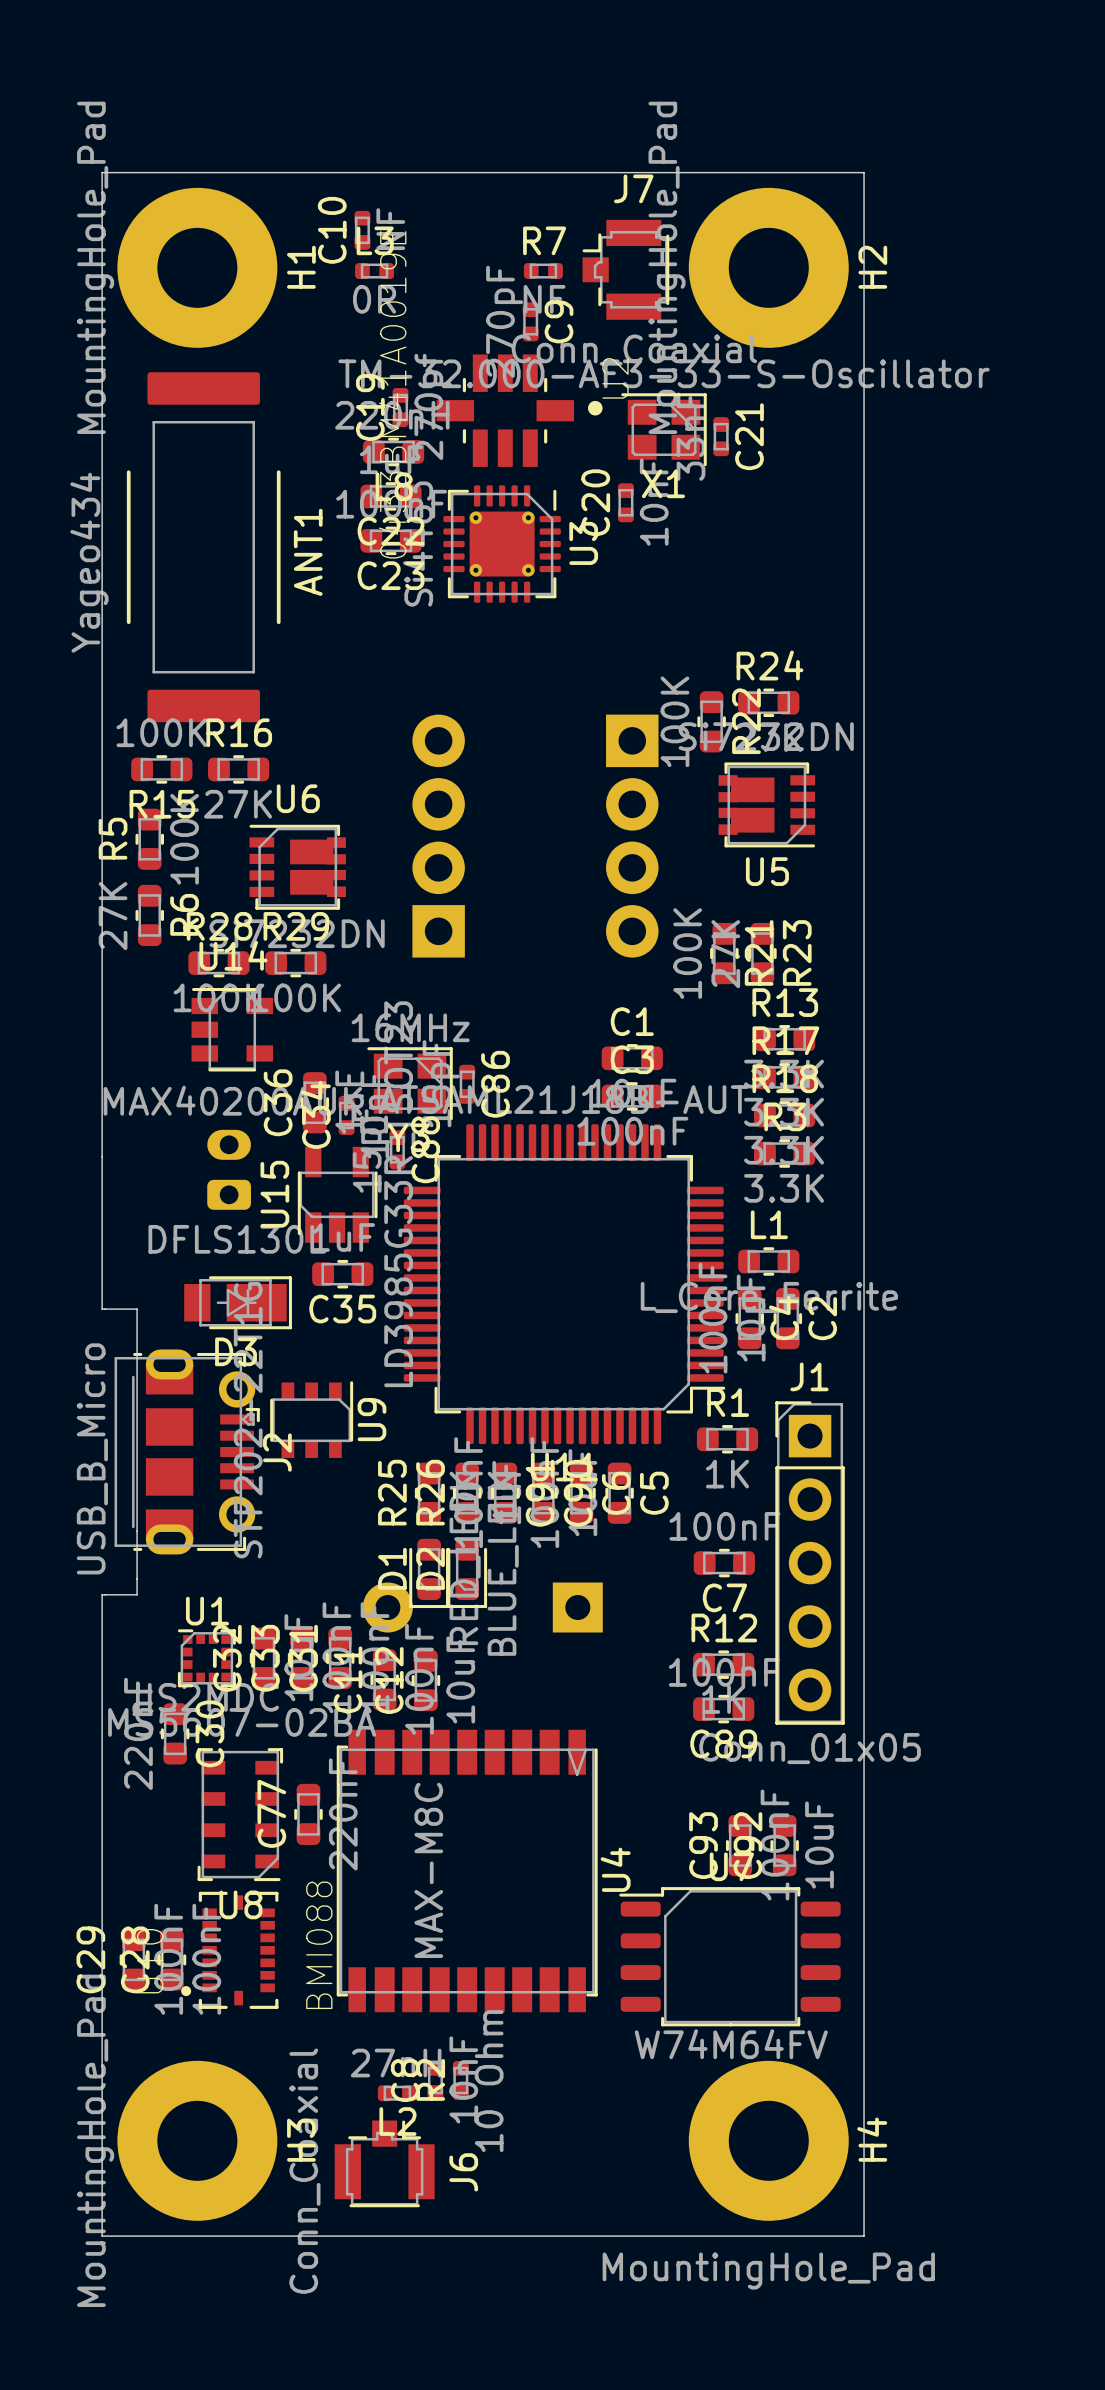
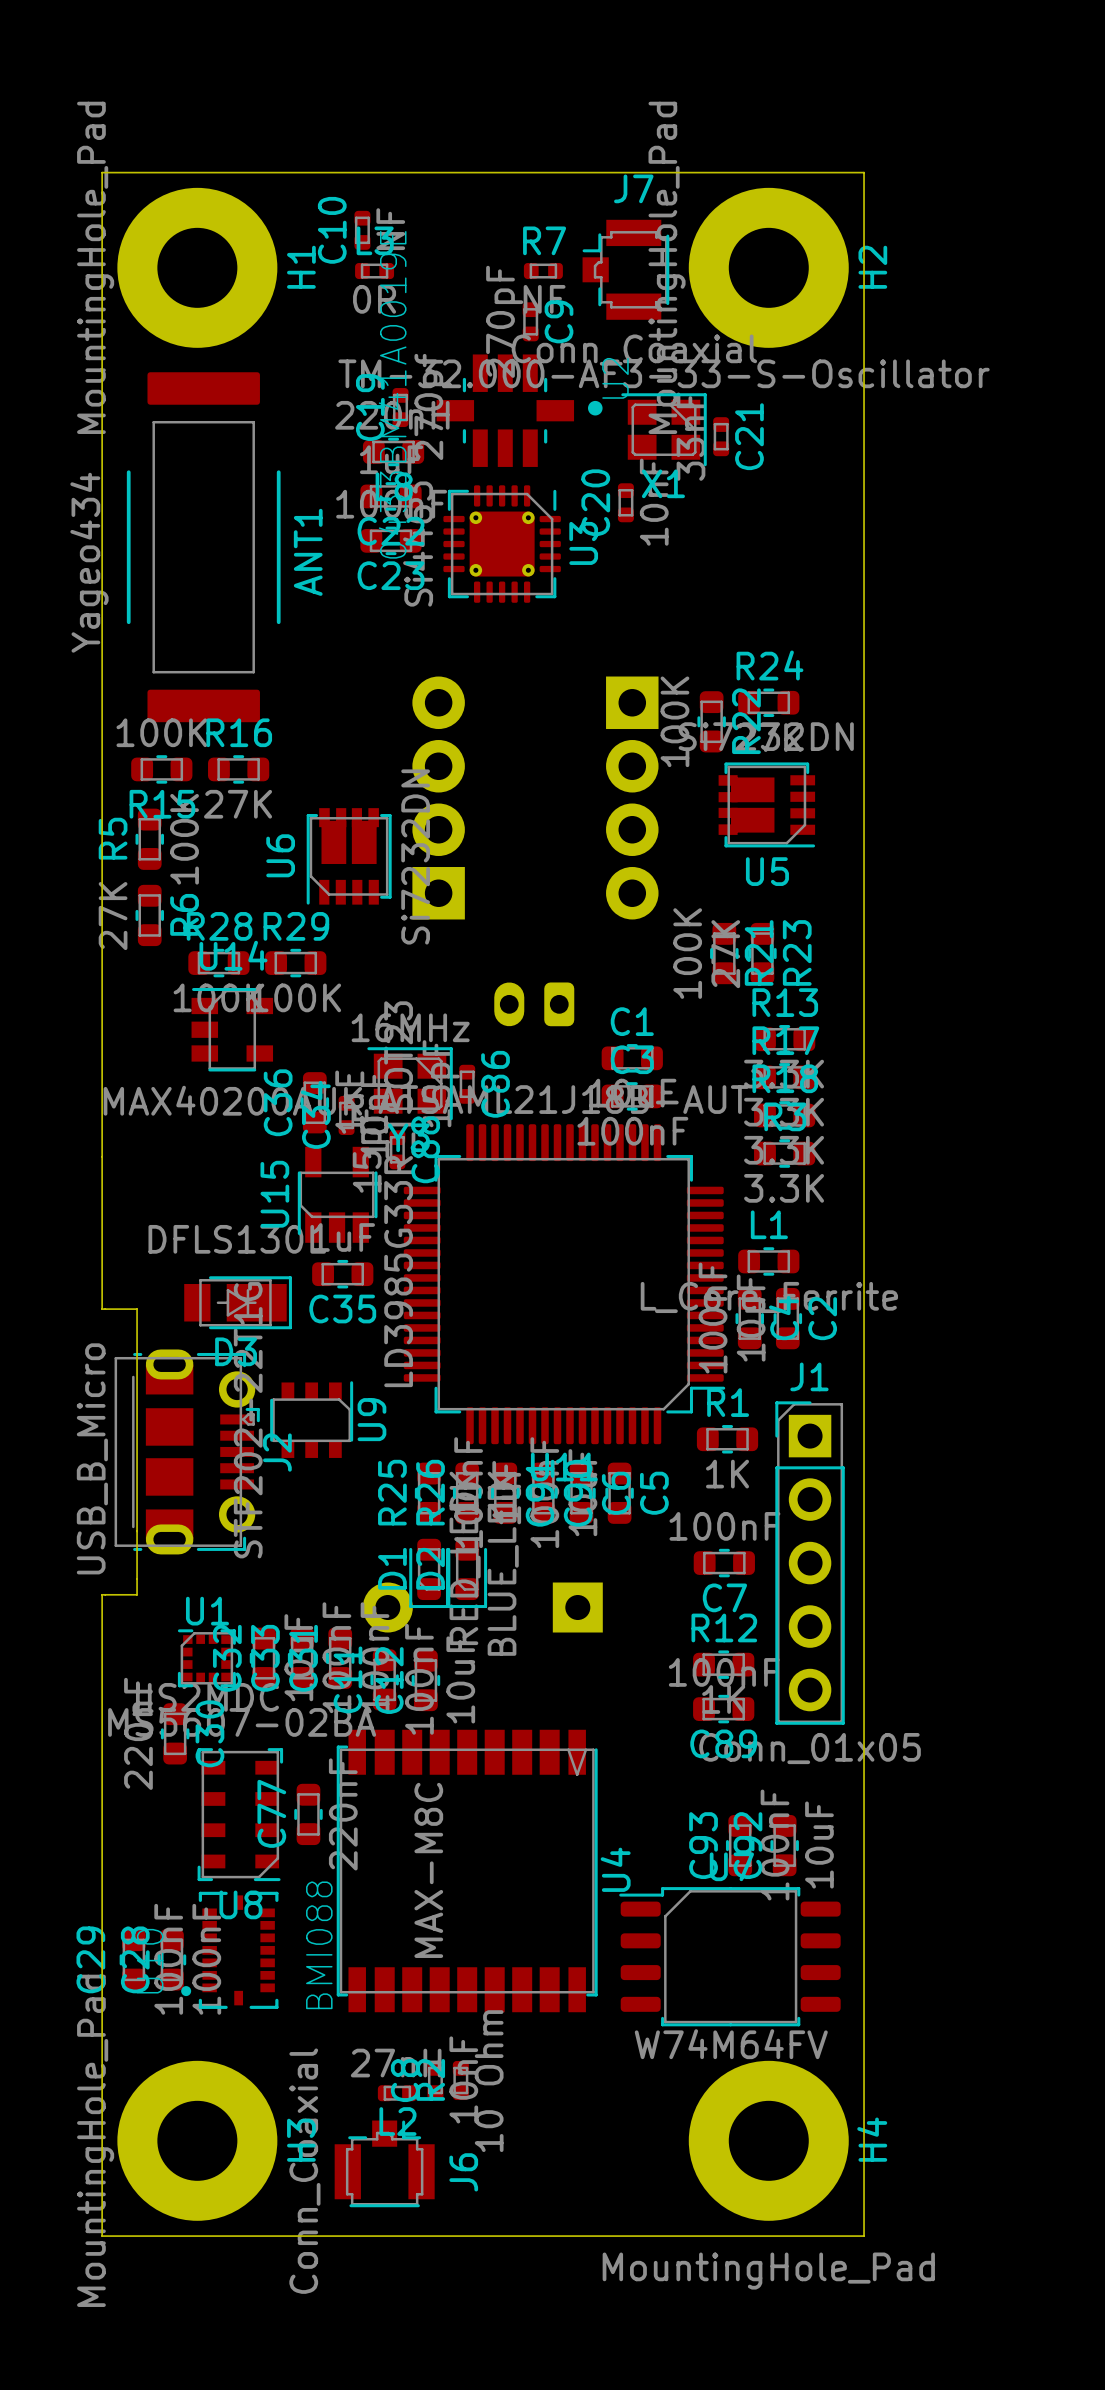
part position: (438, 836) -> (438, 798)
part position: (632, 836) -> (632, 798)
U6 rotation: 0° (297, 867) -> 90° counterclockwise (349, 856)
part rotation: 0° (229, 1169) -> 90° counterclockwise (534, 1004)
part position: (229, 1169) -> (534, 1004)

